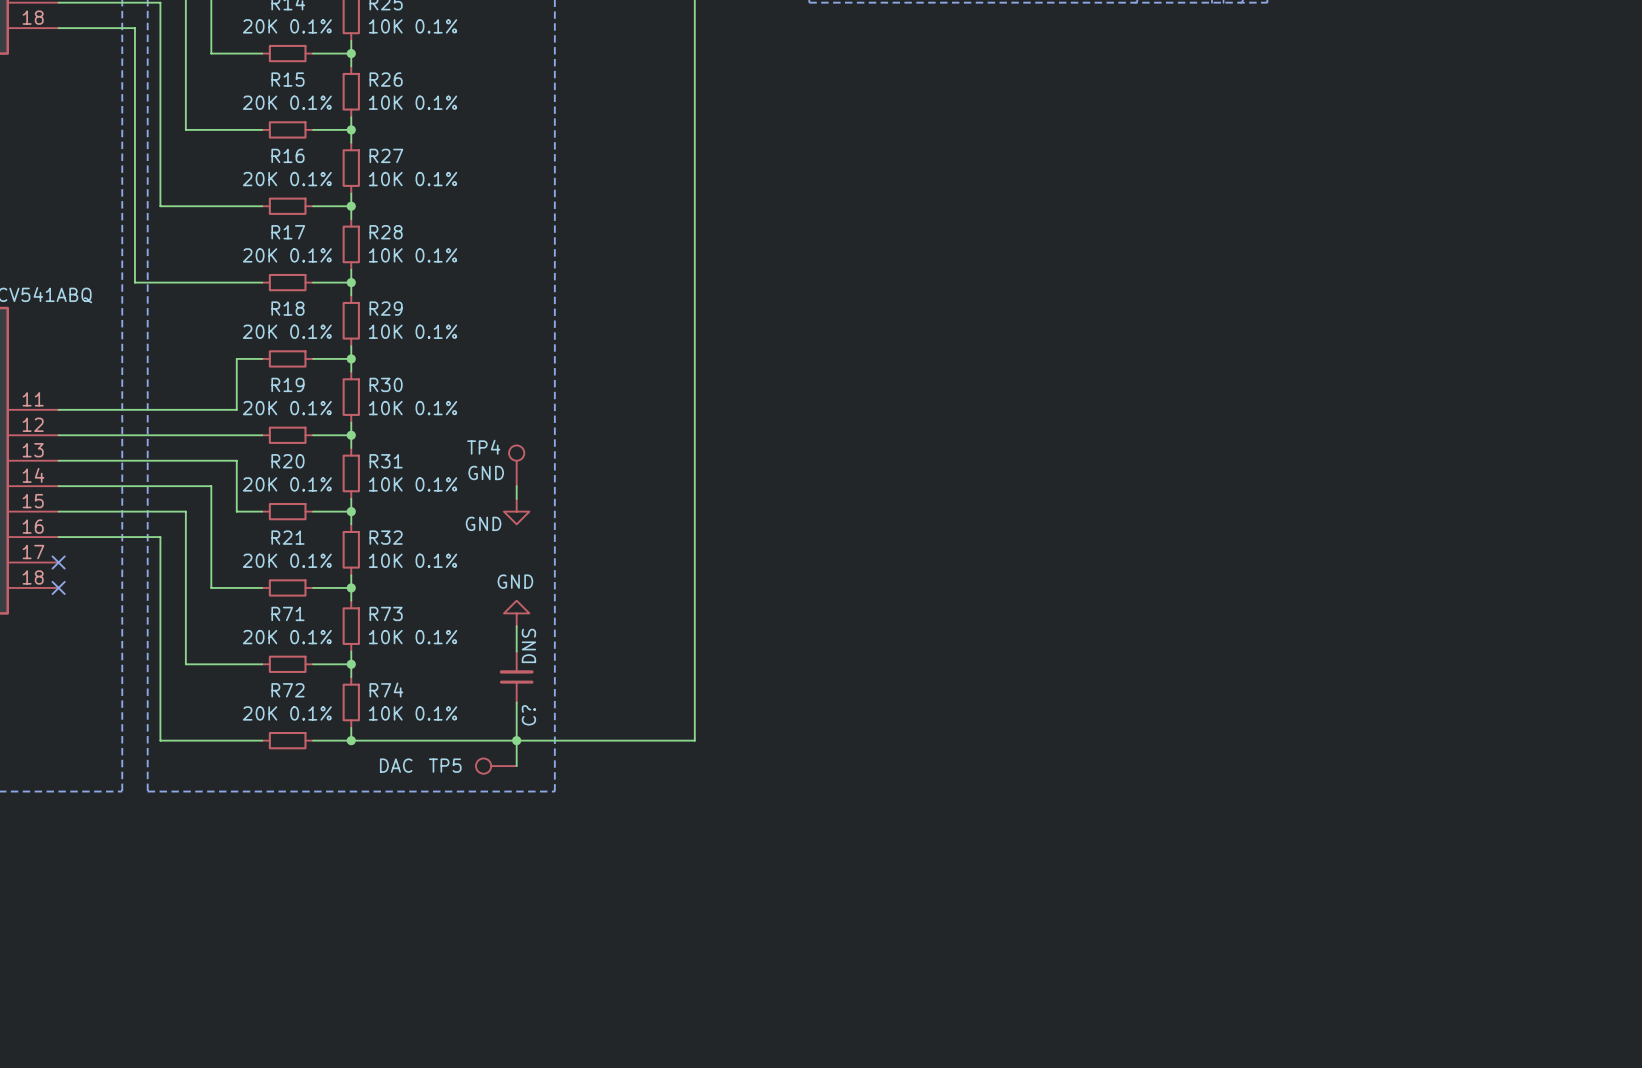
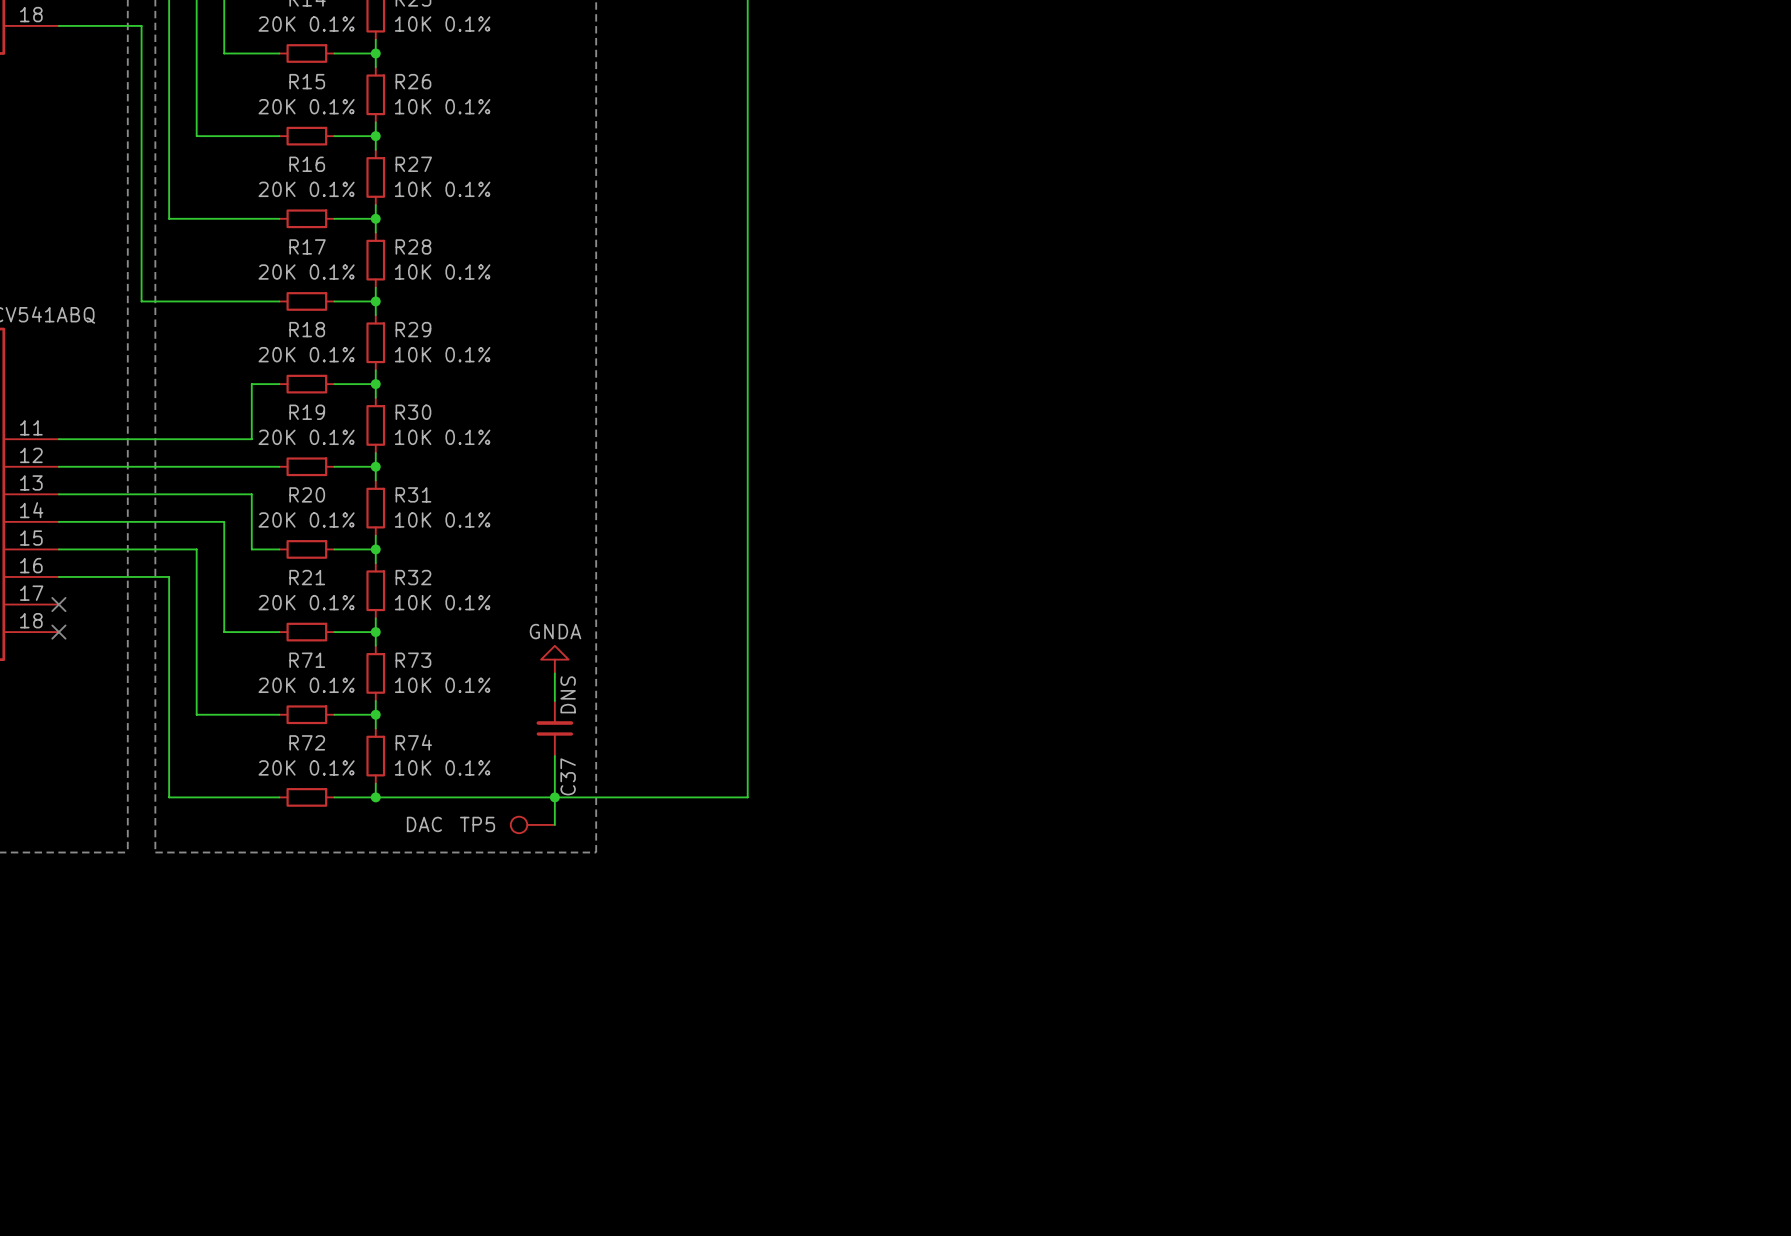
TP4: GND (516, 465) -> none
wire: (516, 486) (516, 498) -> none
power symbol: GND (516, 511) -> none
power symbol: GND (516, 613) -> GNDA (554, 659)
C? name: C? (528, 715) -> C37 (568, 776)

